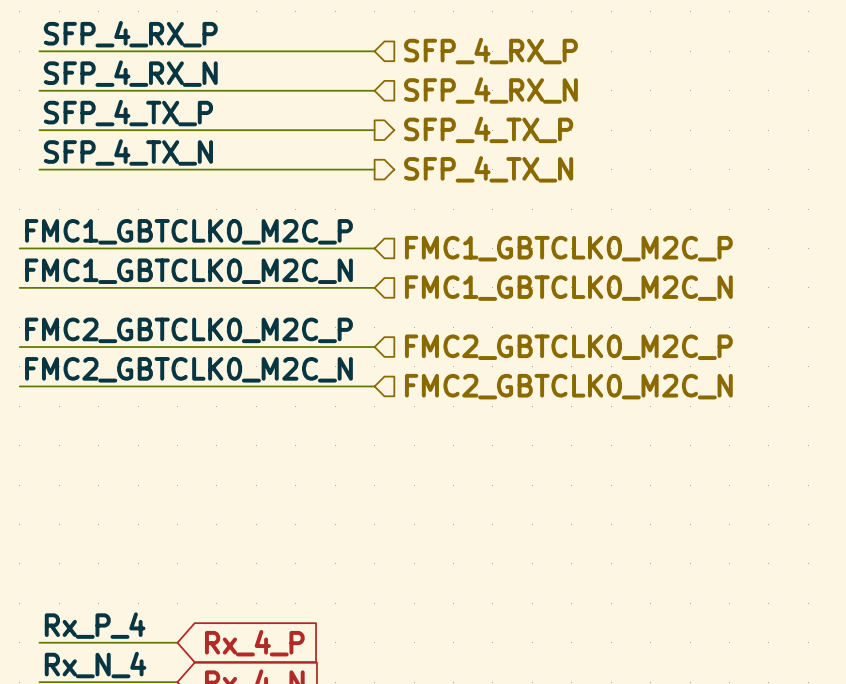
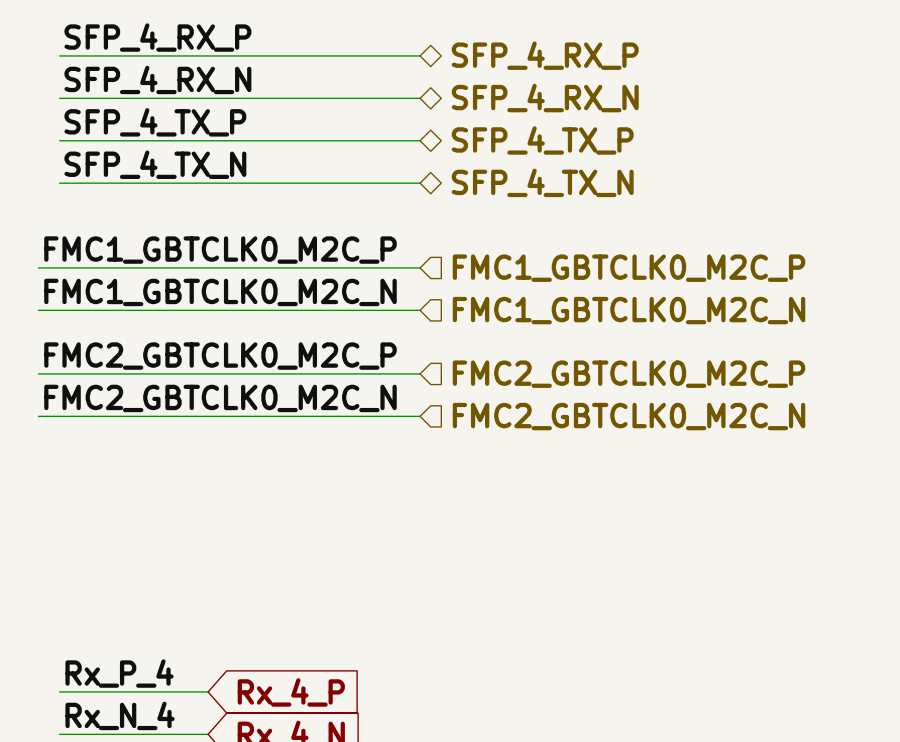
hierarchical label shape: input (490, 51) -> bidirectional (545, 55)
hierarchical label shape: input (490, 90) -> bidirectional (545, 98)
hierarchical label shape: output (488, 129) -> bidirectional (542, 140)
hierarchical label shape: output (488, 169) -> bidirectional (542, 182)

